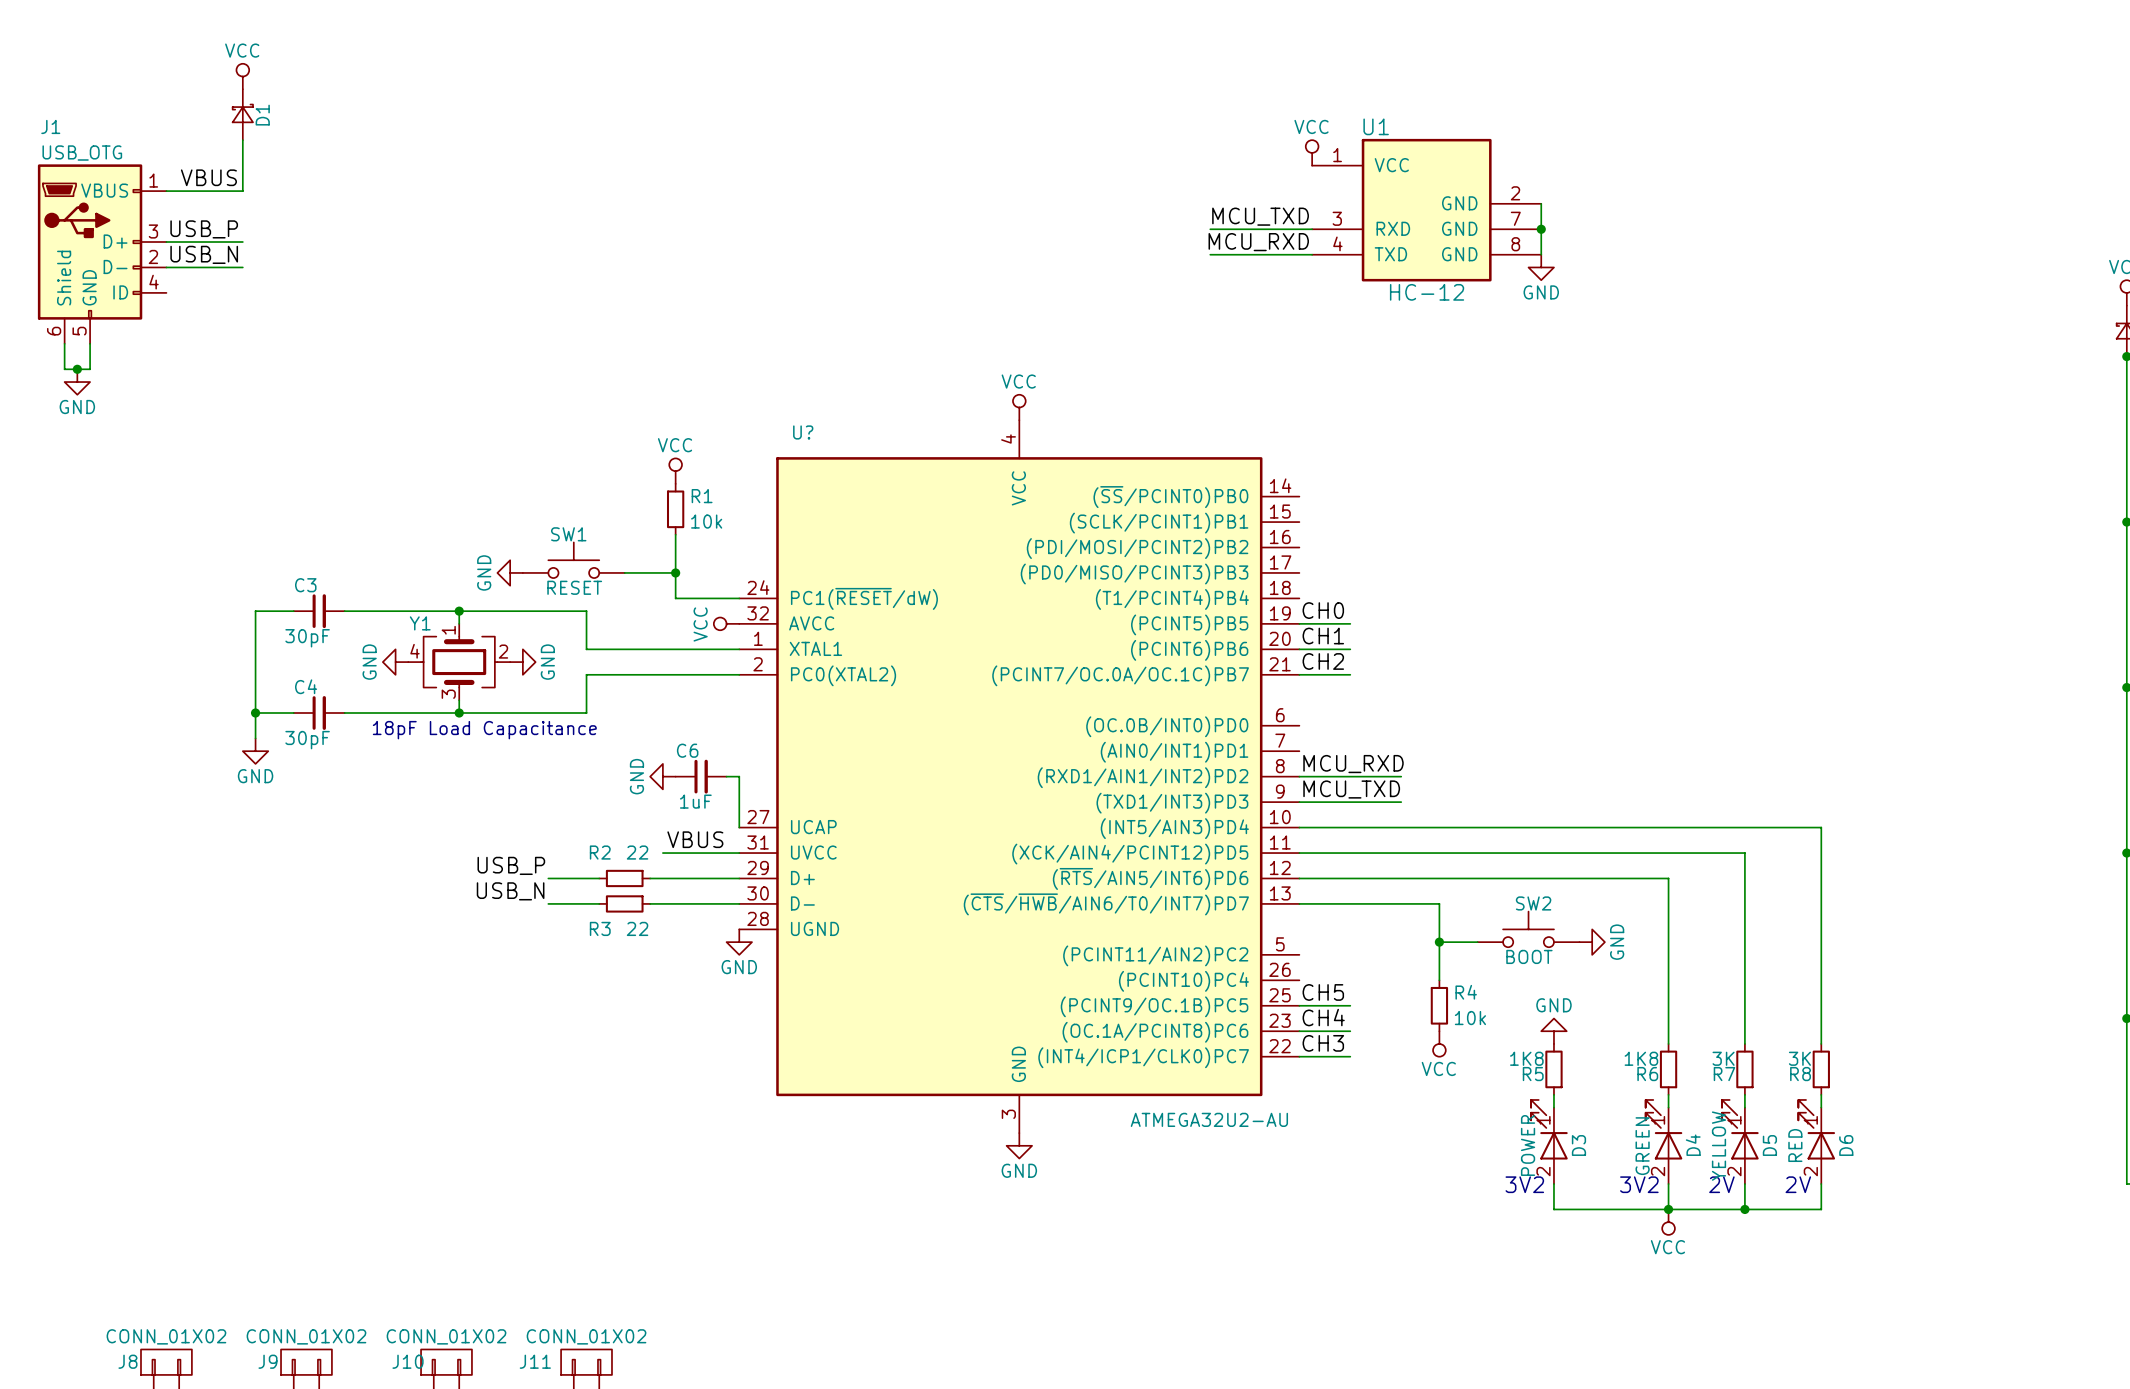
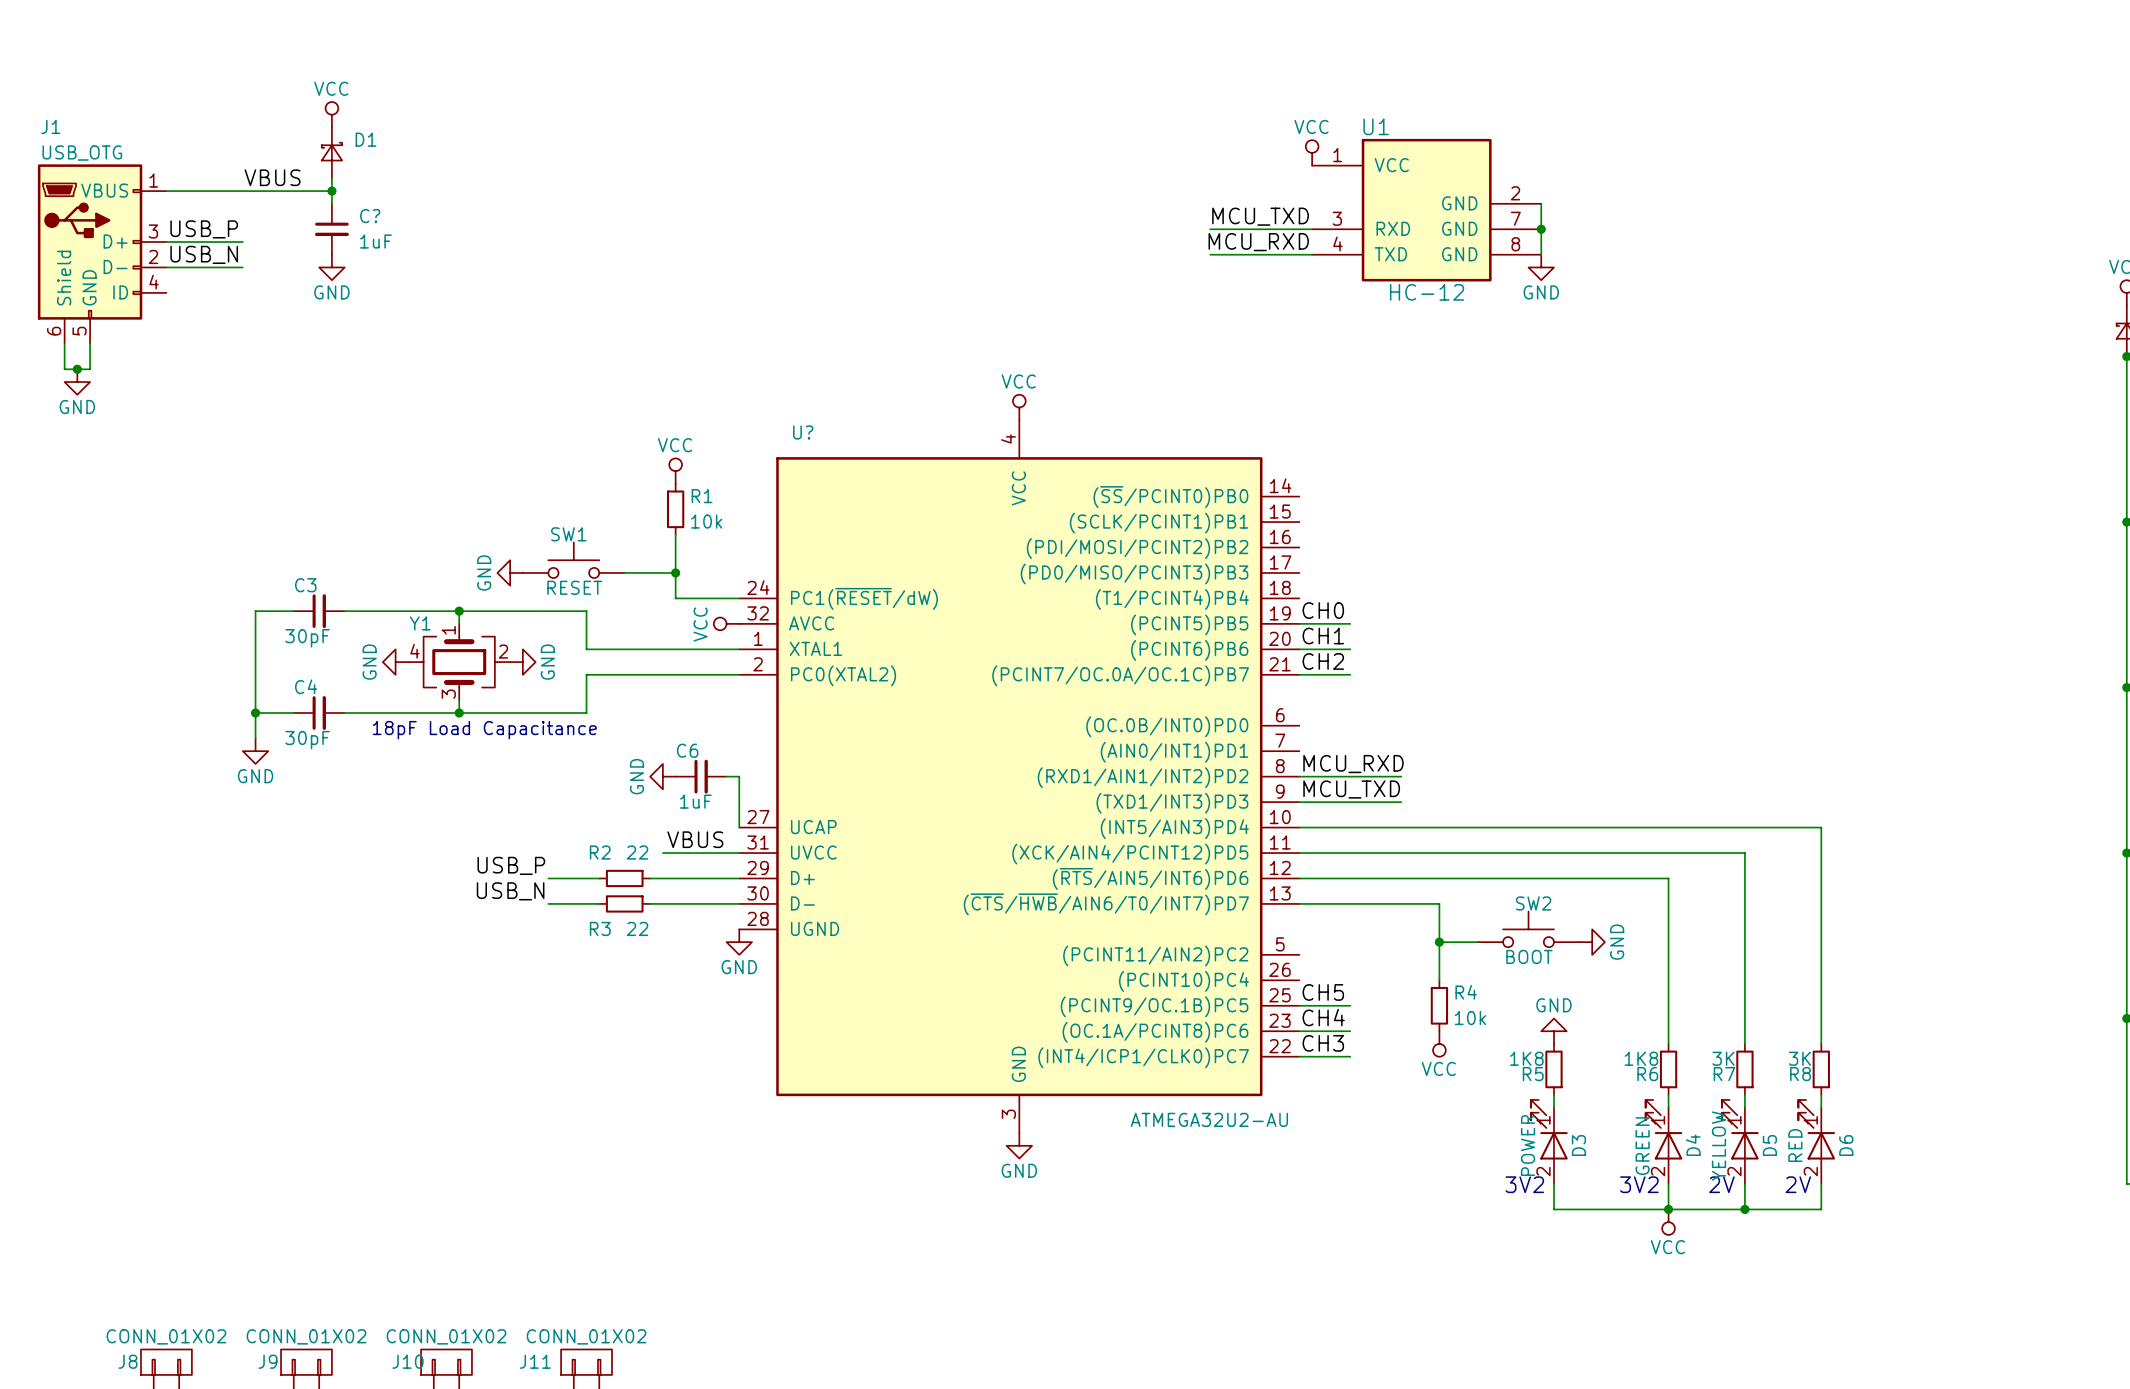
power symbol position: VCC (242, 76) -> VCC (331, 114)
D1 position: (242, 114) -> (331, 152)
D1 name rotation: 0° (262, 115) -> 90° clockwise (366, 139)
wire: (242, 140) (242, 191) -> (331, 191) (242, 191)
label position: VBUS (208, 177) -> VBUS (272, 177)
wire: none -> (331, 178) (331, 203)
junction: none -> (331, 191)
C?: none -> 1uF (331, 229)
power symbol: none -> GND (331, 267)

